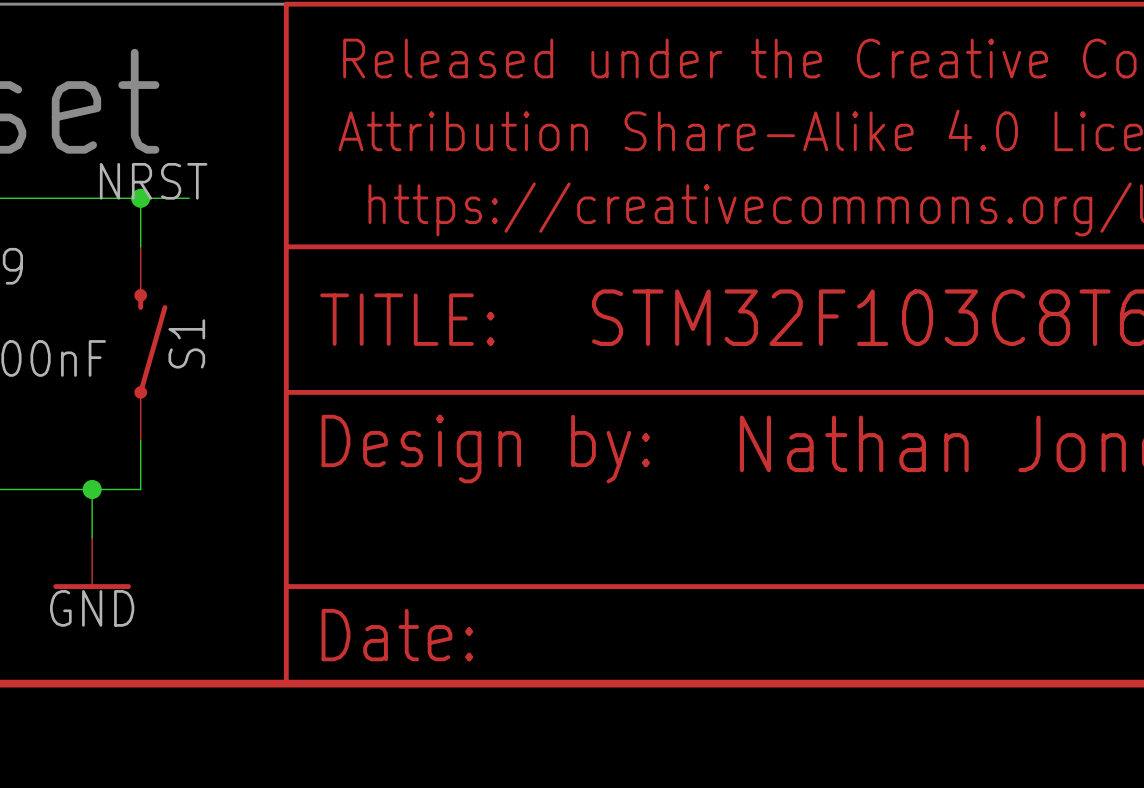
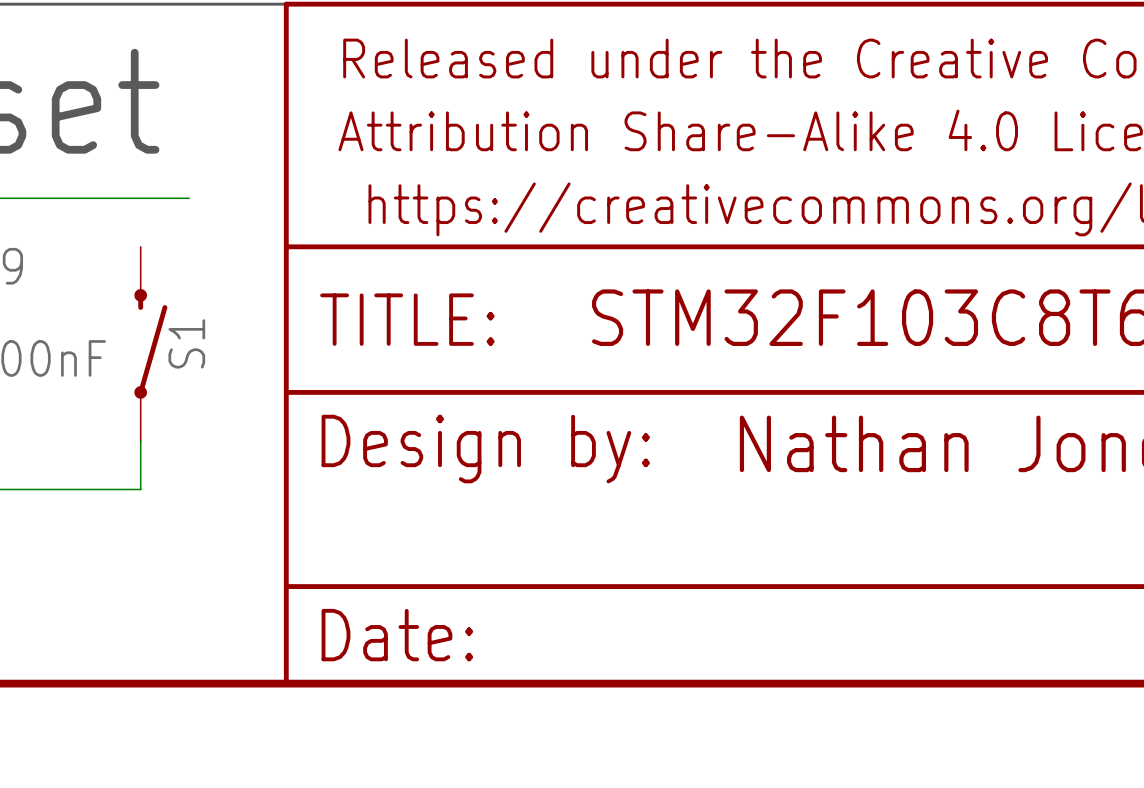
label: NRST (153, 181) -> none
wire: (140, 198) (140, 246) -> none
junction: (140, 198) -> none
wire: (92, 489) (92, 538) -> none
junction: (92, 489) -> none
power symbol: GND (92, 563) -> none

